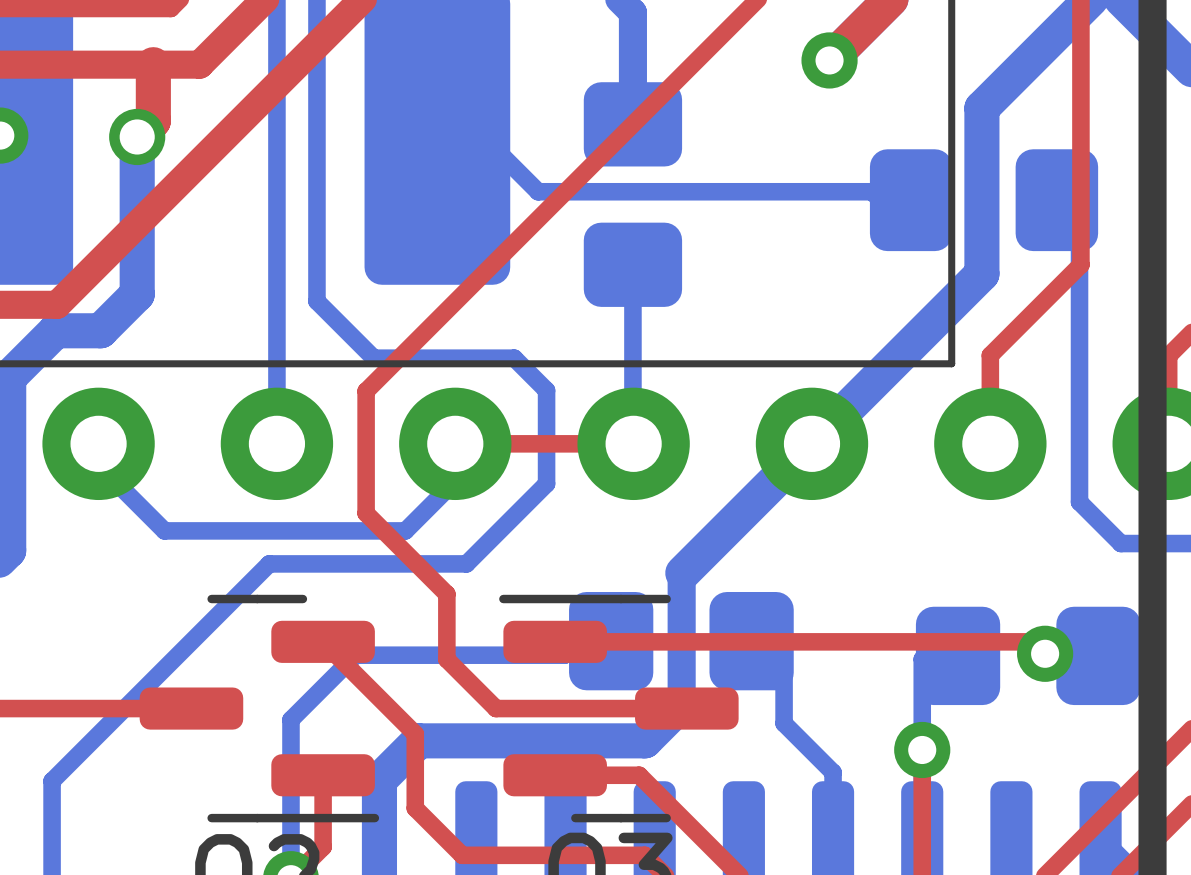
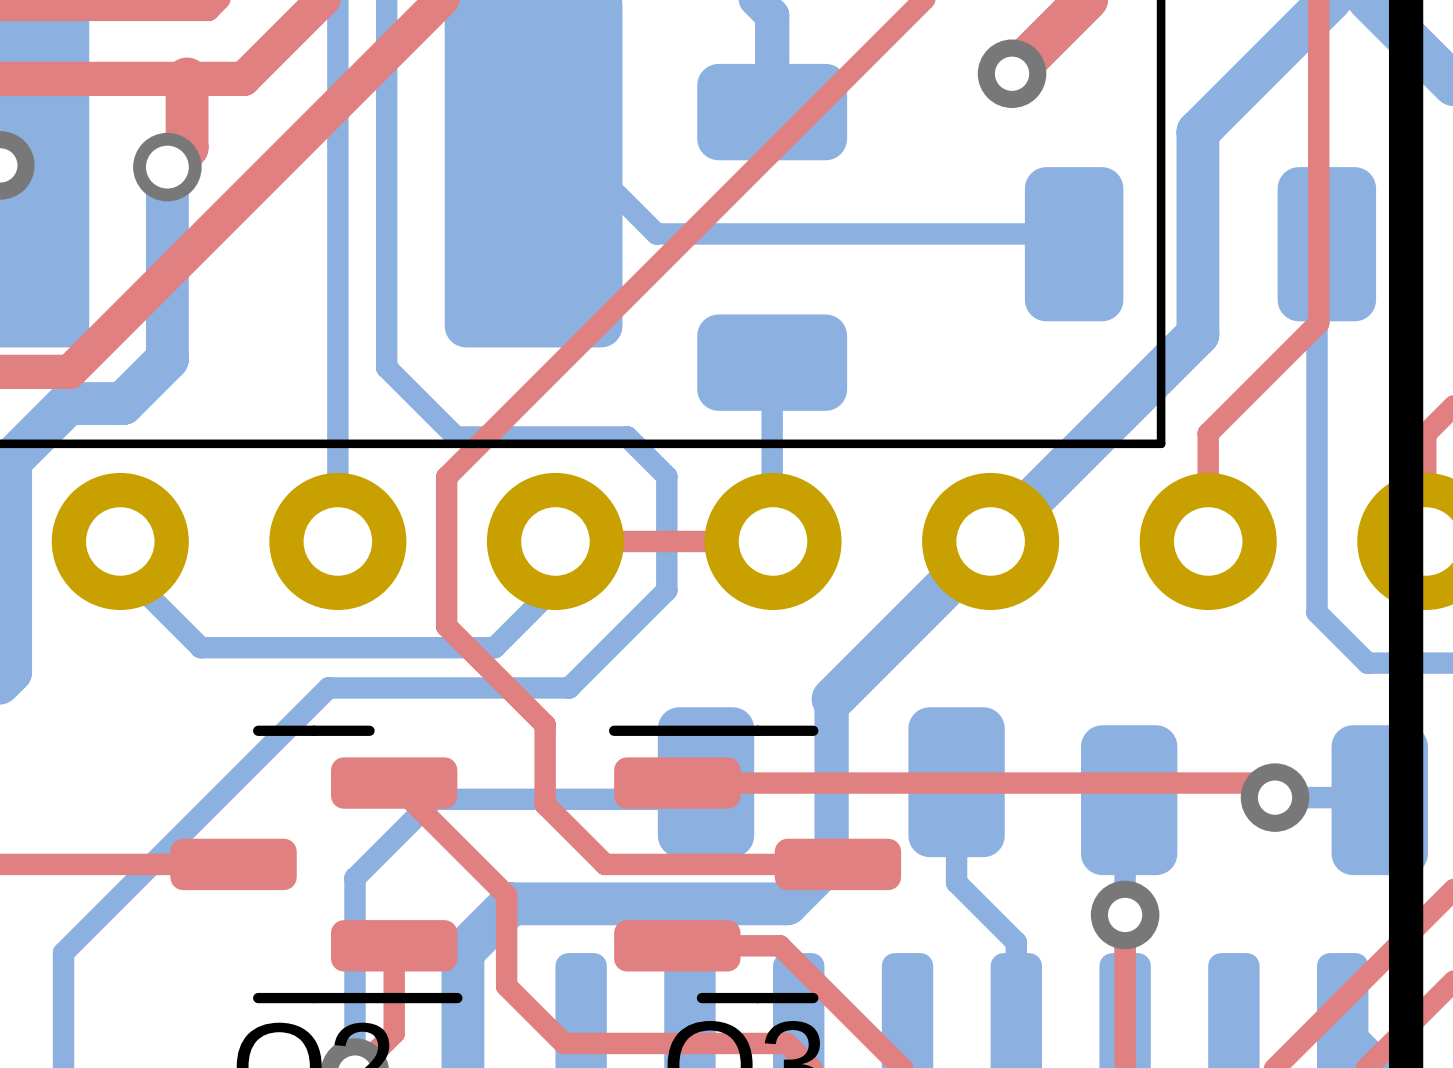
part footprint: [583, 82, 683, 307] -> [697, 63, 848, 411]
part footprint: [869, 149, 1099, 252] -> [1024, 167, 1377, 322]
part footprint: [569, 591, 794, 691] -> [657, 707, 1005, 858]
part footprint: [915, 606, 1141, 706] -> [1080, 725, 1428, 876]

